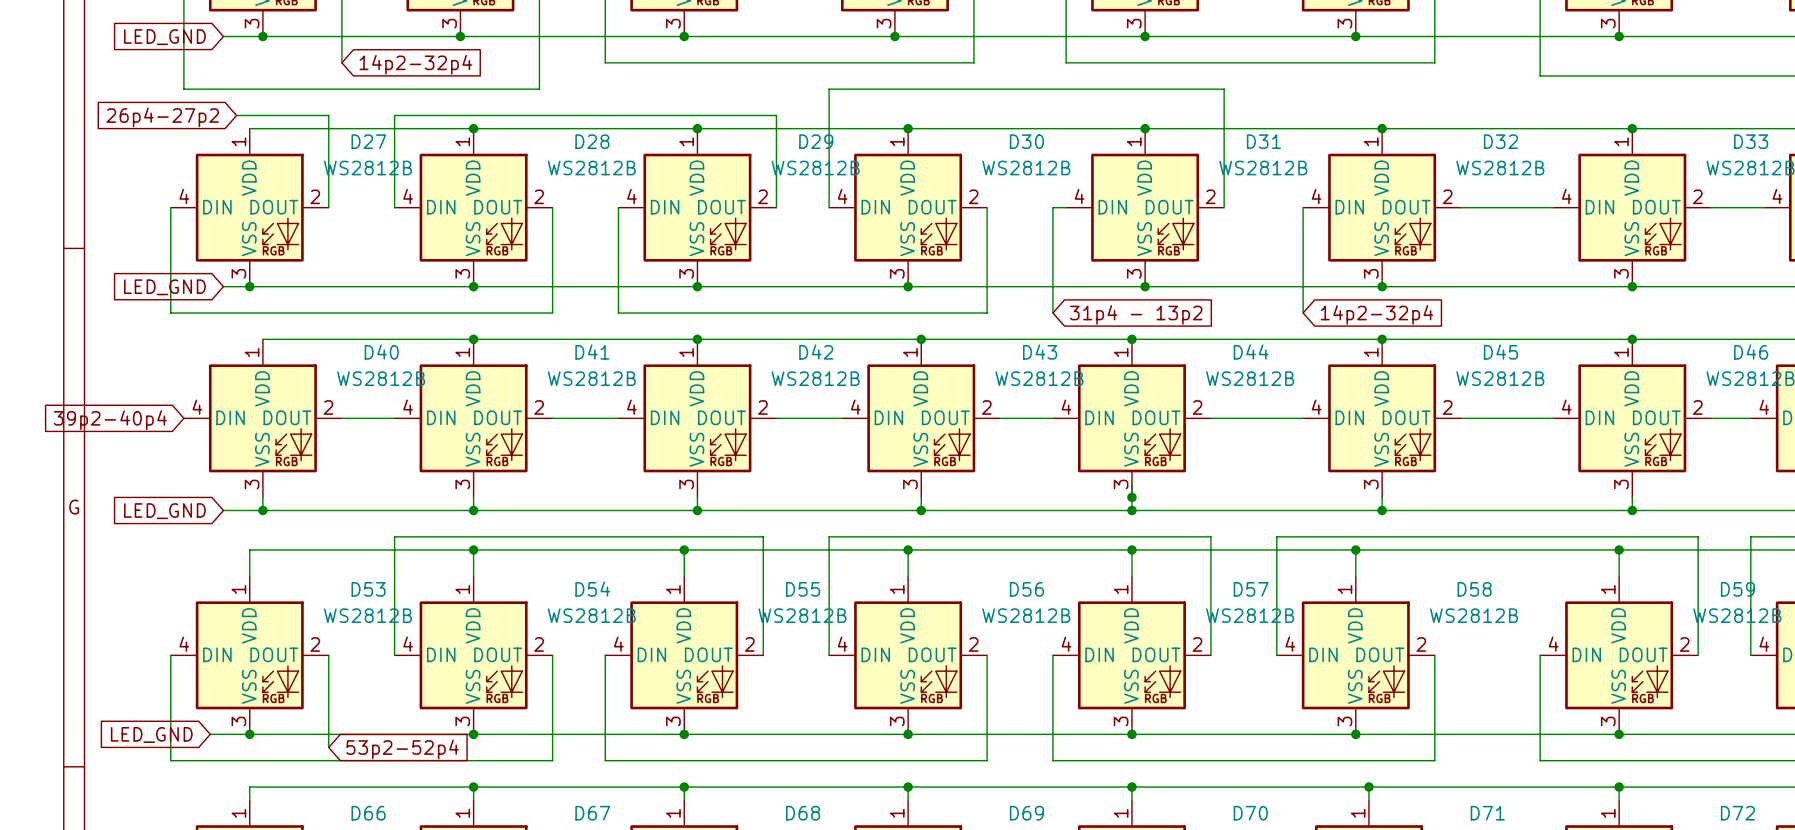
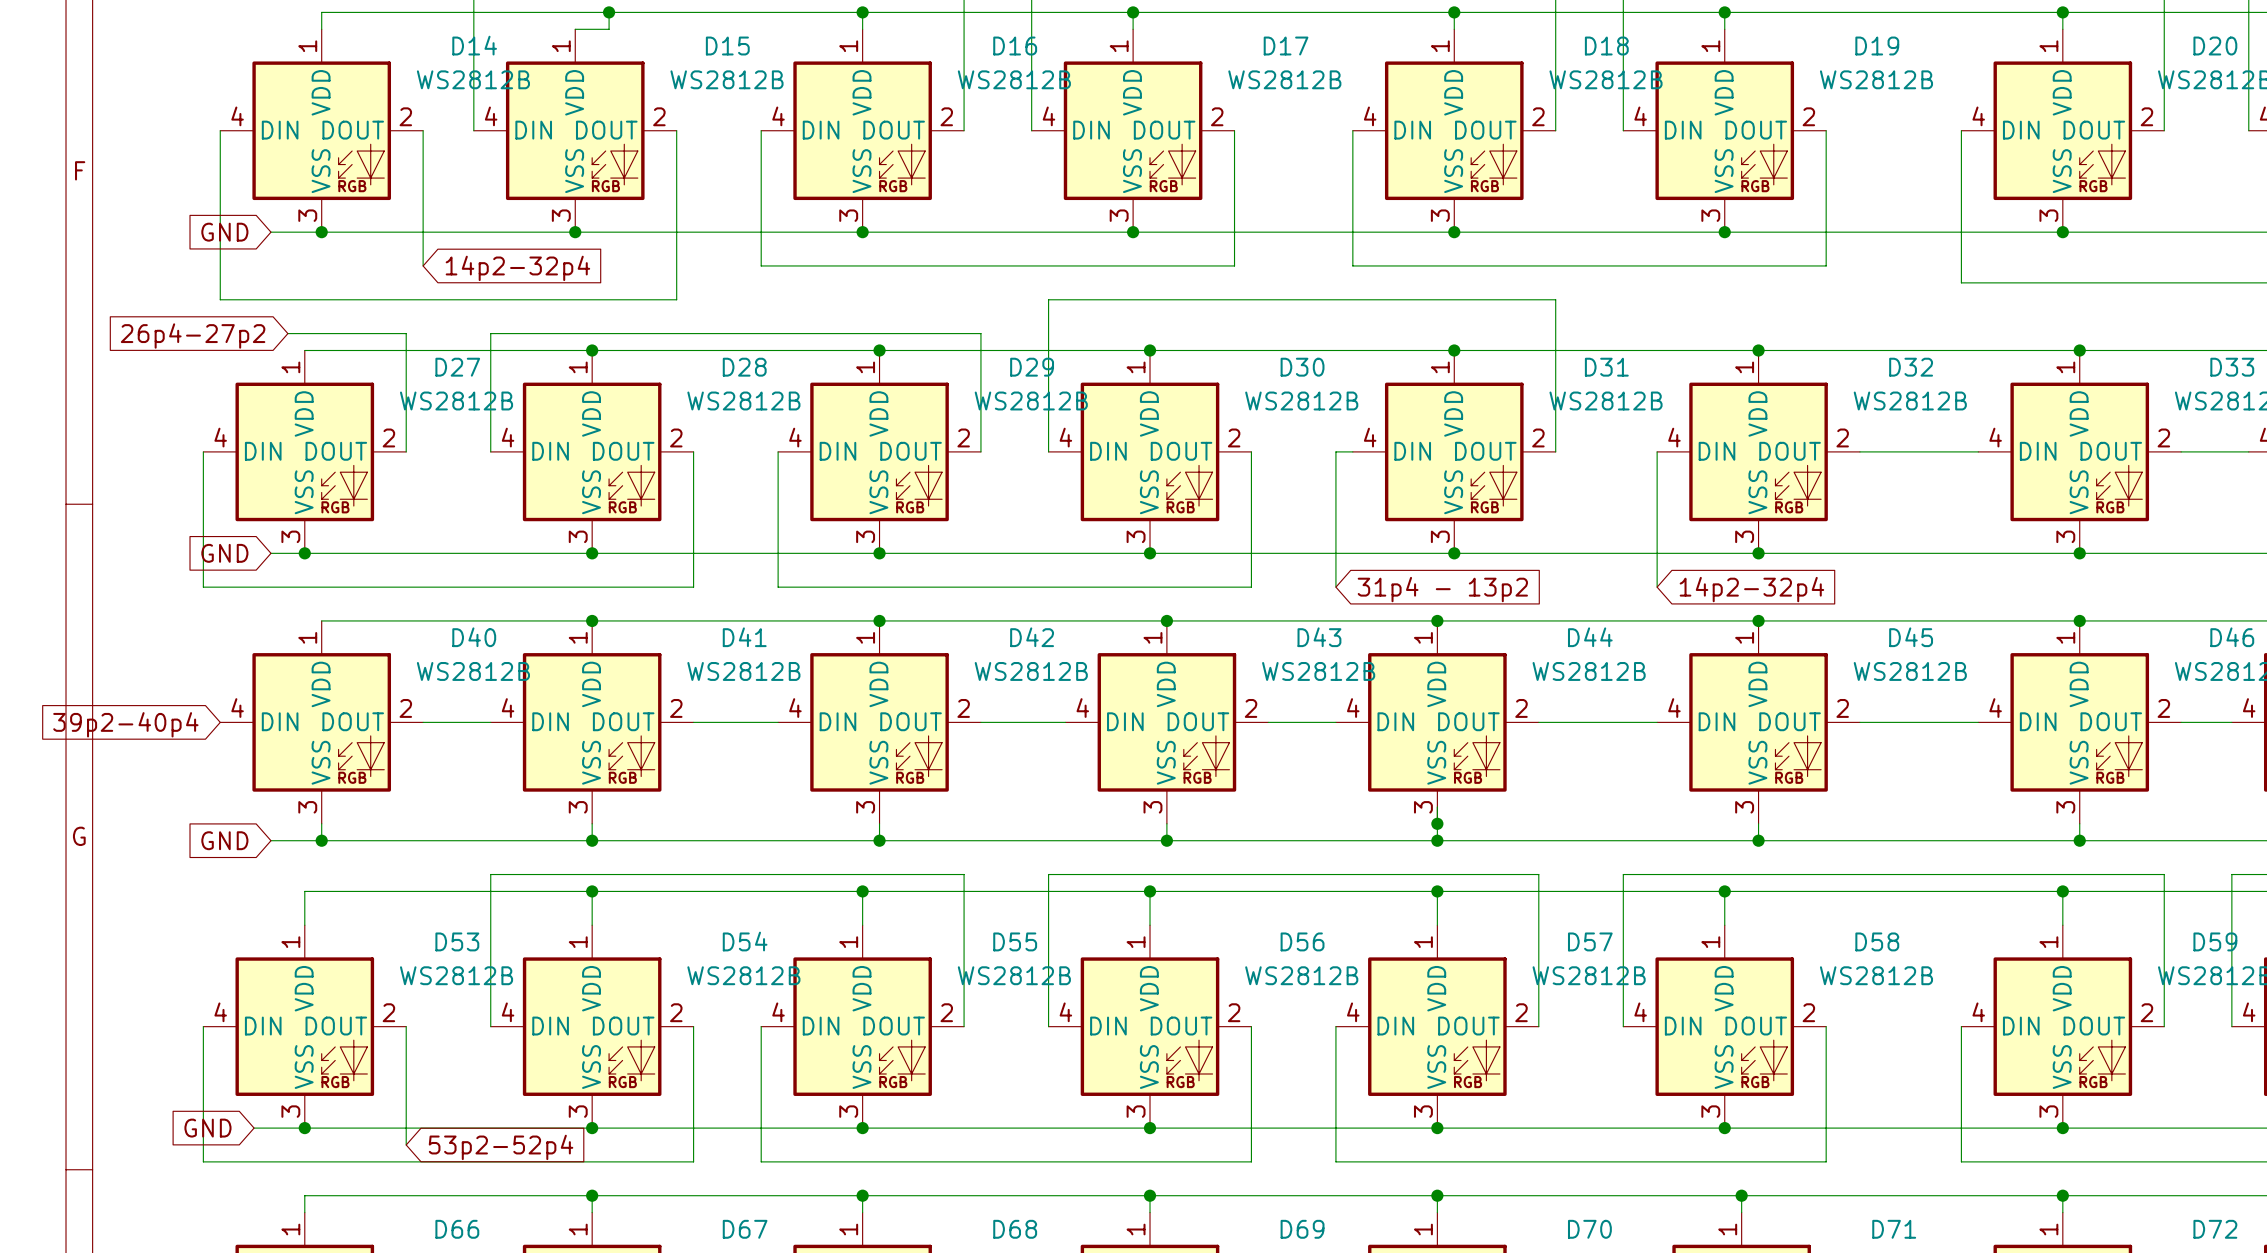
global label: LED_GND (164, 37) -> GND (224, 232)
global label: LED_GND (164, 287) -> GND (224, 553)
global label: LED_GND (164, 511) -> GND (224, 840)
global label: LED_GND (151, 734) -> GND (207, 1128)

